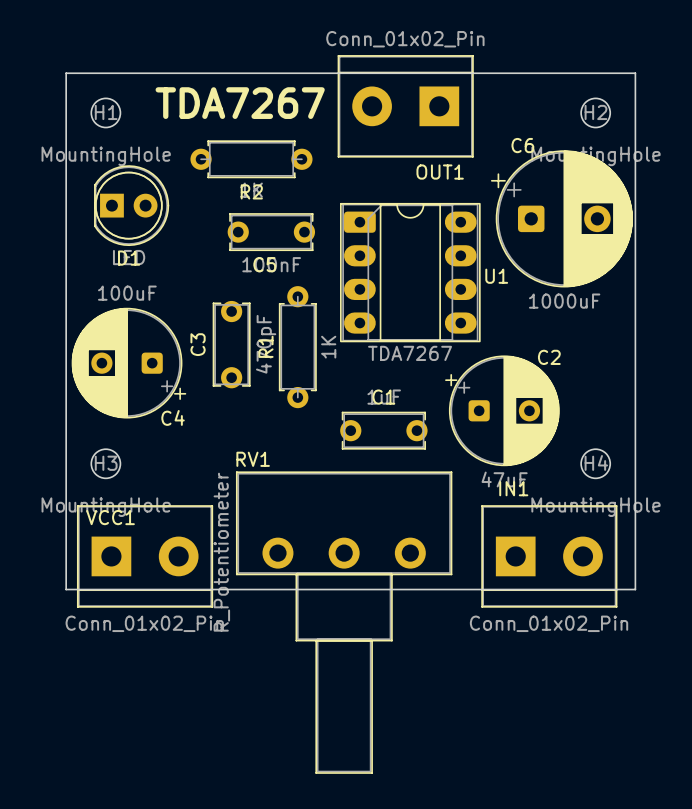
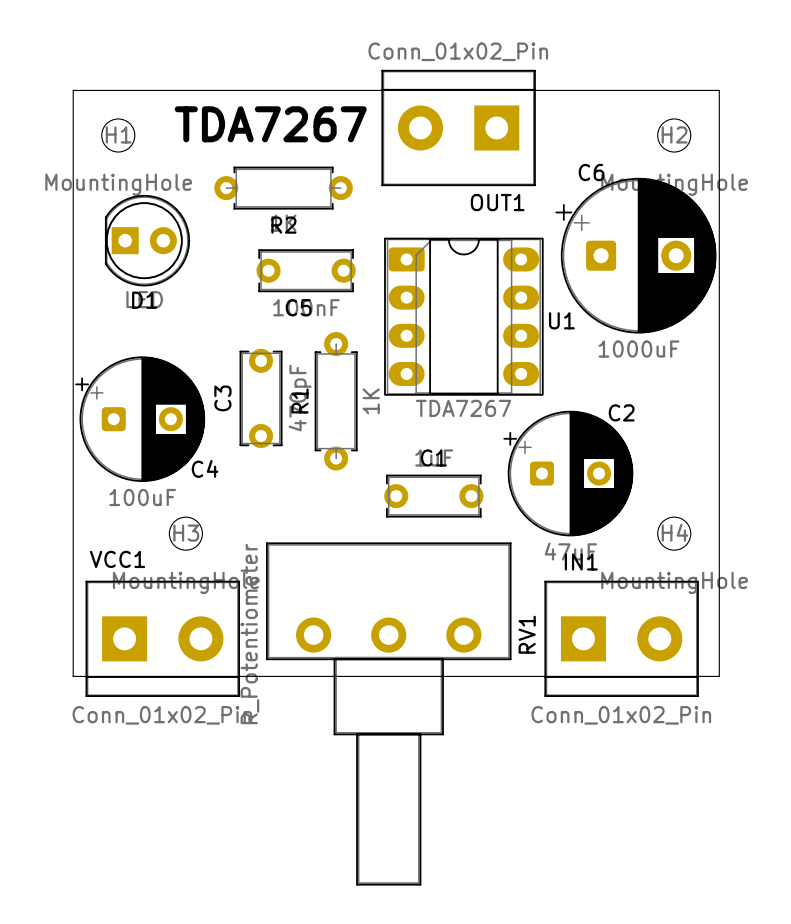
C4 rotation: 0° (128, 363) -> 180° (140, 419)
RV1 name rotation: 0° (253, 459) -> 90° counterclockwise (527, 634)
RV1 name position: RV1 (253, 459) -> RV1 (527, 634)
H3 position: (105, 463) -> (185, 533)
VCC1 name position: VCC1 (110, 517) -> VCC1 (117, 559)

